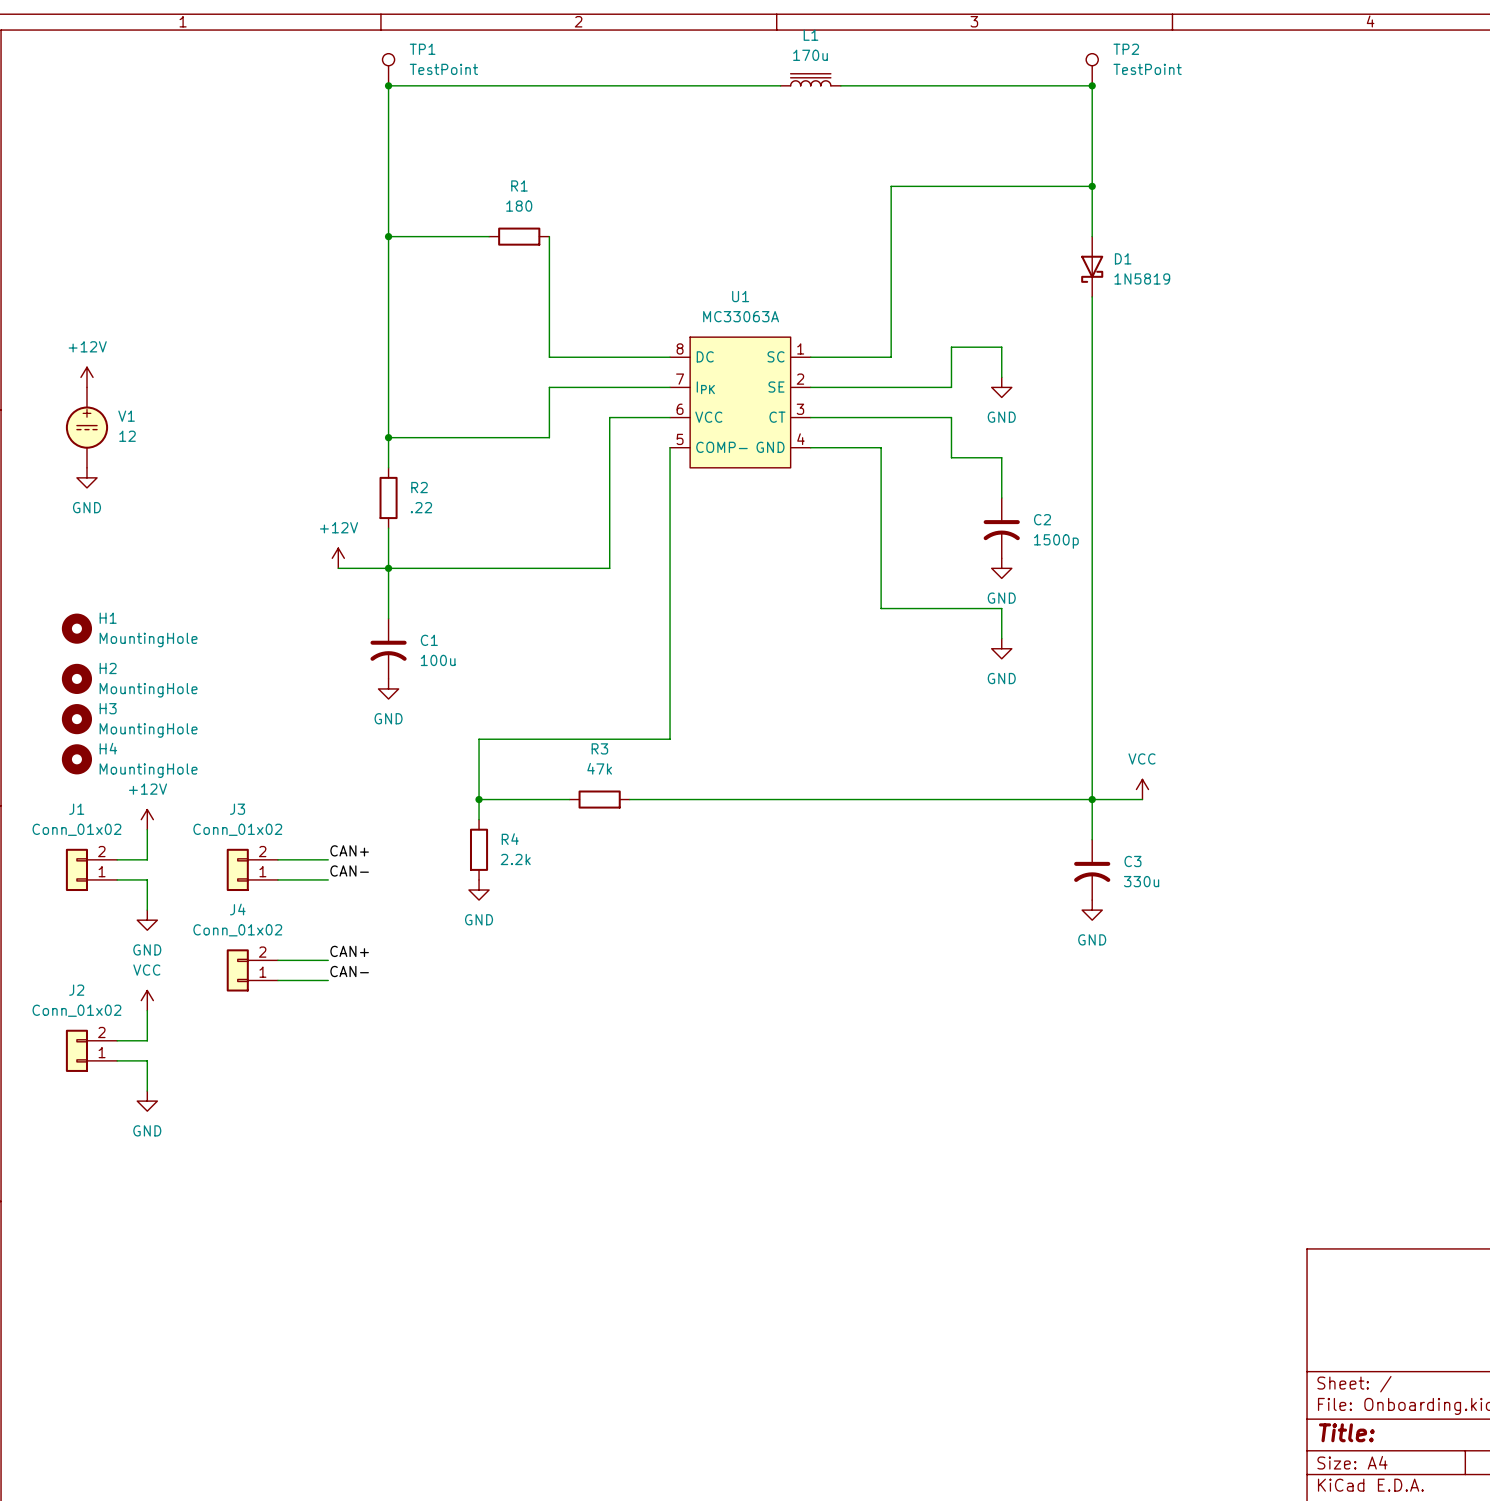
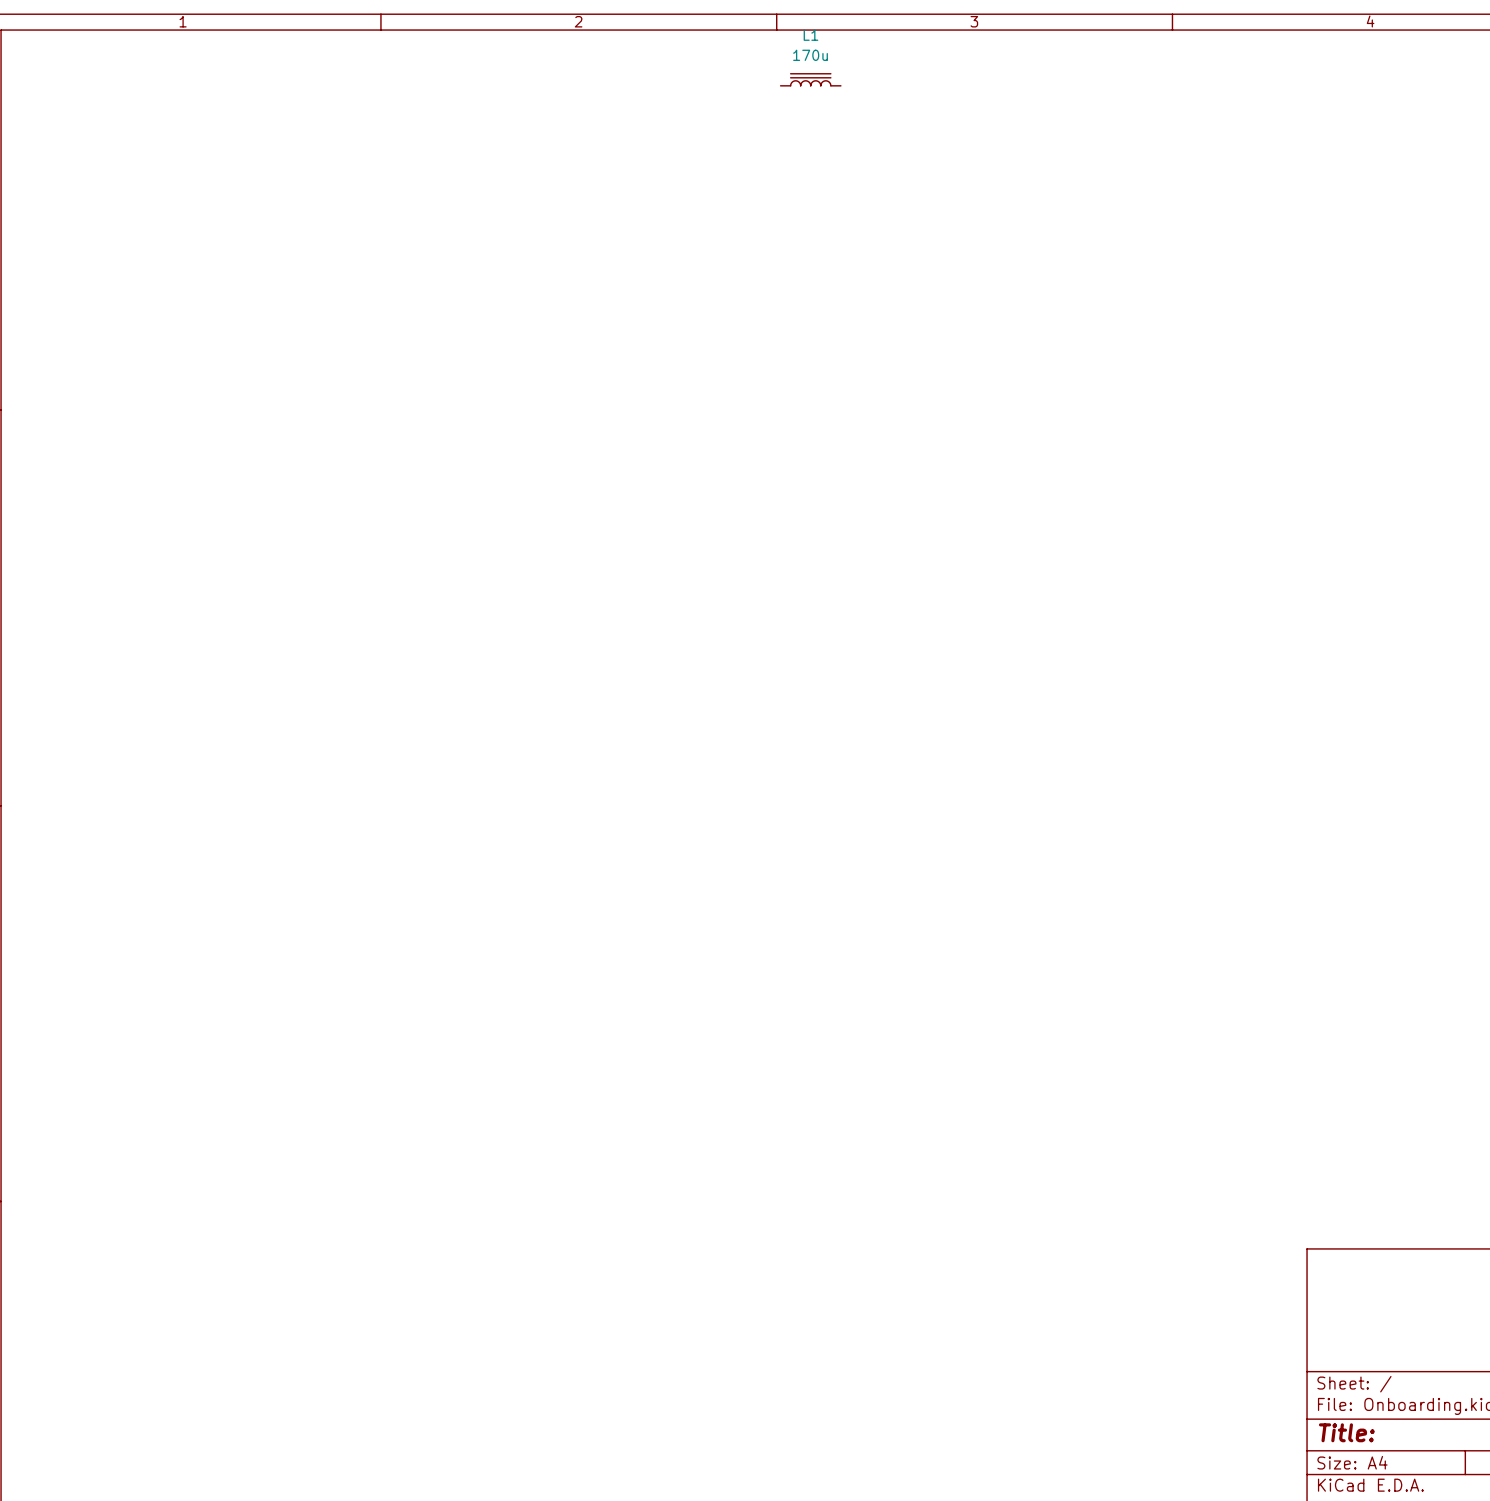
TP1: TestPoint (388, 69) -> none
TP2: TestPoint (1092, 69) -> none
junction: (388, 85) -> none
wire: (780, 85) (388, 85) (388, 467) -> none
wire: (840, 85) (1092, 85) (1092, 236) -> none
junction: (1092, 85) -> none
wire: (1092, 186) (891, 186) (891, 357) (810, 357) -> none
junction: (1092, 186) -> none
wire: (388, 236) (489, 236) -> none
junction: (388, 236) -> none
R1: 180 (519, 236) -> none
wire: (549, 236) (549, 357) (670, 357) -> none
D1: 1N5819 (1092, 266) -> none
wire: (1092, 296) (1092, 839) -> none
power symbol: +12V (86, 377) -> none
wire: (1001, 377) (1001, 347) (951, 347) (951, 387) (810, 387) -> none
wire: (670, 387) (549, 387) (549, 437) (388, 437) -> none
power symbol: GND (1001, 387) -> none
U1: MC33063A (740, 402) -> none
wire: (670, 417) (609, 417) (609, 568) (338, 568) -> none
wire: (810, 417) (951, 417) (951, 457) (1001, 457) (1001, 497) -> none
V1: 12 (86, 427) -> none
junction: (388, 437) -> none
wire: (670, 447) (670, 739) (479, 739) (479, 819) -> none
wire: (810, 447) (881, 447) (881, 608) (1001, 608) (1001, 638) -> none
power symbol: GND (86, 477) -> none
R2: .22 (388, 497) -> none
wire: (388, 528) (388, 618) -> none
C2: 1500p (1001, 528) -> none
power symbol: +12V (338, 558) -> none
junction: (388, 568) -> none
power symbol: GND (1001, 568) -> none
H1: MountingHole (76, 628) -> none
C1: 100u (388, 648) -> none
power symbol: GND (1001, 648) -> none
H2: MountingHole (76, 678) -> none
power symbol: GND (388, 688) -> none
H3: MountingHole (76, 719) -> none
H4: MountingHole (76, 759) -> none
power symbol: VCC (1142, 789) -> none
wire: (479, 799) (569, 799) -> none
junction: (479, 799) -> none
R3: 47k (599, 799) -> none
wire: (629, 799) (1142, 799) -> none
junction: (1092, 799) -> none
power symbol: +12V (147, 819) -> none
wire: (147, 829) (147, 859) (117, 859) -> none
R4: 2.2k (479, 849) -> none
label: CAN+ (349, 850) -> none
wire: (277, 859) (328, 859) -> none
J1: Conn_01x02 (91, 869) -> none
J3: Conn_01x02 (252, 869) -> none
C3: 330u (1092, 869) -> none
label: CAN- (349, 870) -> none
wire: (117, 879) (147, 879) (147, 910) -> none
wire: (277, 879) (328, 879) -> none
power symbol: GND (479, 890) -> none
power symbol: GND (1092, 910) -> none
power symbol: GND (147, 920) -> none
label: CAN+ (349, 951) -> none
wire: (277, 960) (328, 960) -> none
J4: Conn_01x02 (252, 970) -> none
label: CAN- (349, 971) -> none
wire: (277, 980) (328, 980) -> none
power symbol: VCC (147, 1000) -> none
wire: (147, 1010) (147, 1040) (117, 1040) -> none
J2: Conn_01x02 (91, 1050) -> none
wire: (117, 1060) (147, 1060) (147, 1091) -> none
power symbol: GND (147, 1101) -> none

